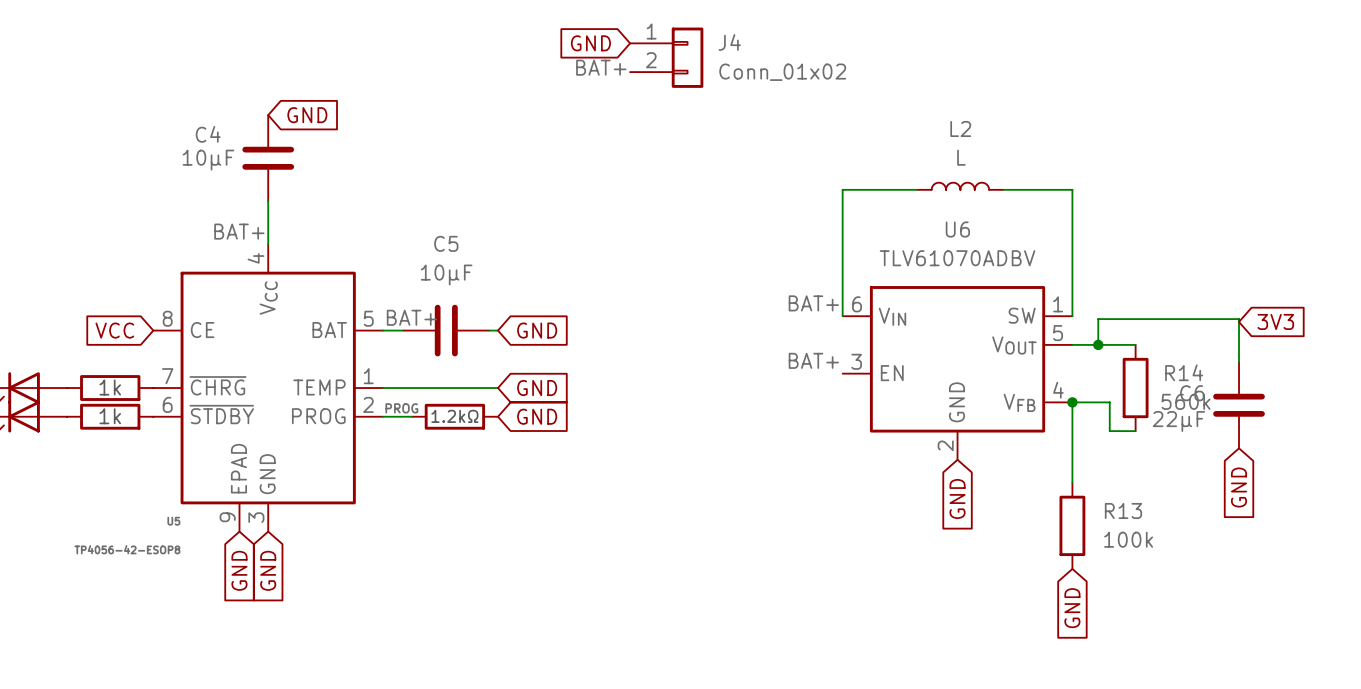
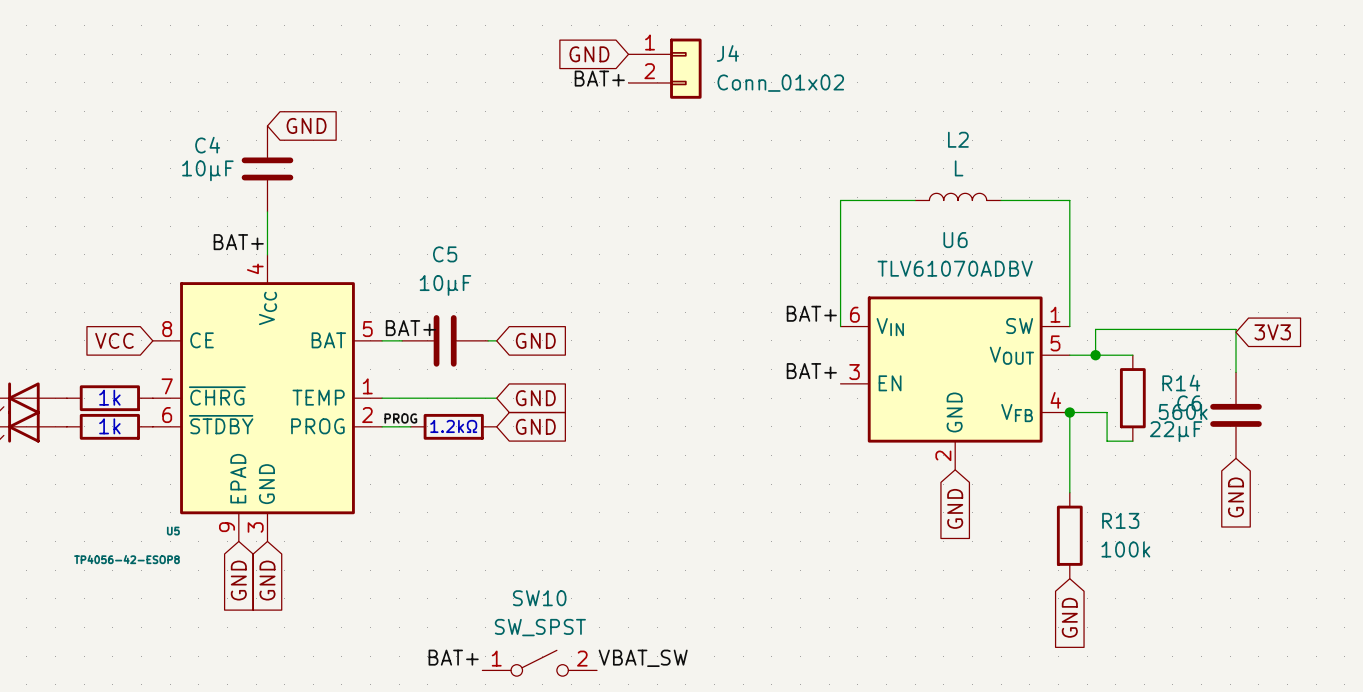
label: none -> BAT+ (453, 657)
label: none -> VBAT_SW (643, 658)
SW10: none -> SW_SPST (539, 663)

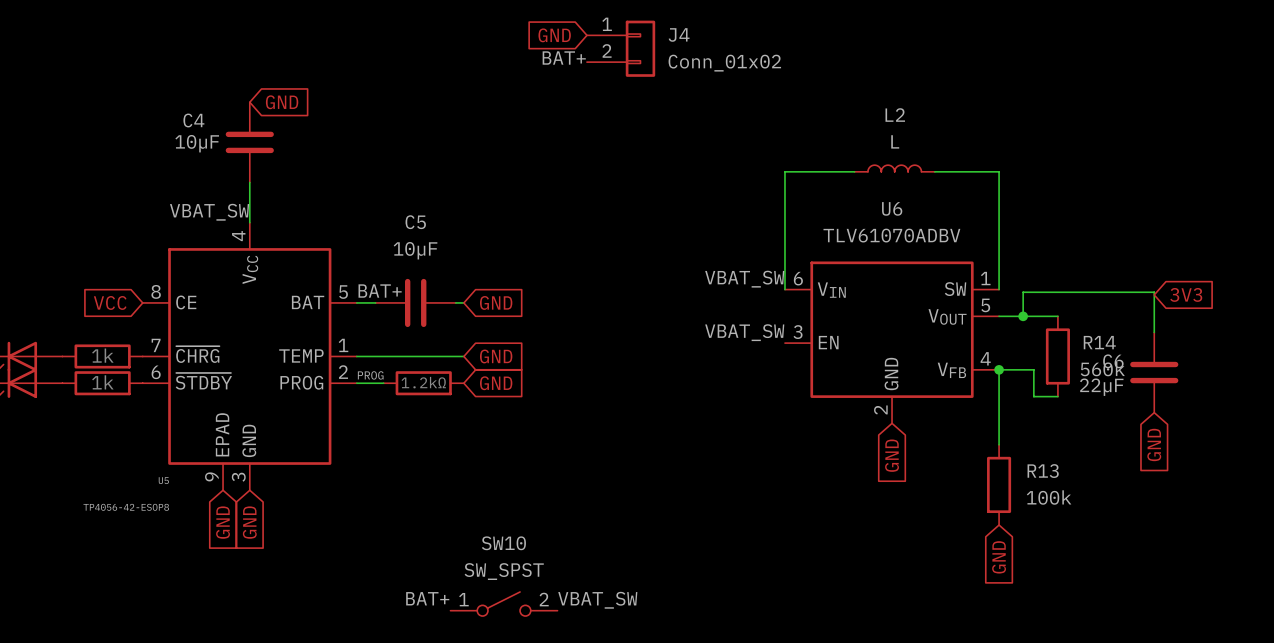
label: BAT+ (238, 242) -> VBAT_SW (209, 212)
label: BAT+ (811, 313) -> VBAT_SW (744, 279)
label: BAT+ (811, 371) -> VBAT_SW (744, 332)

